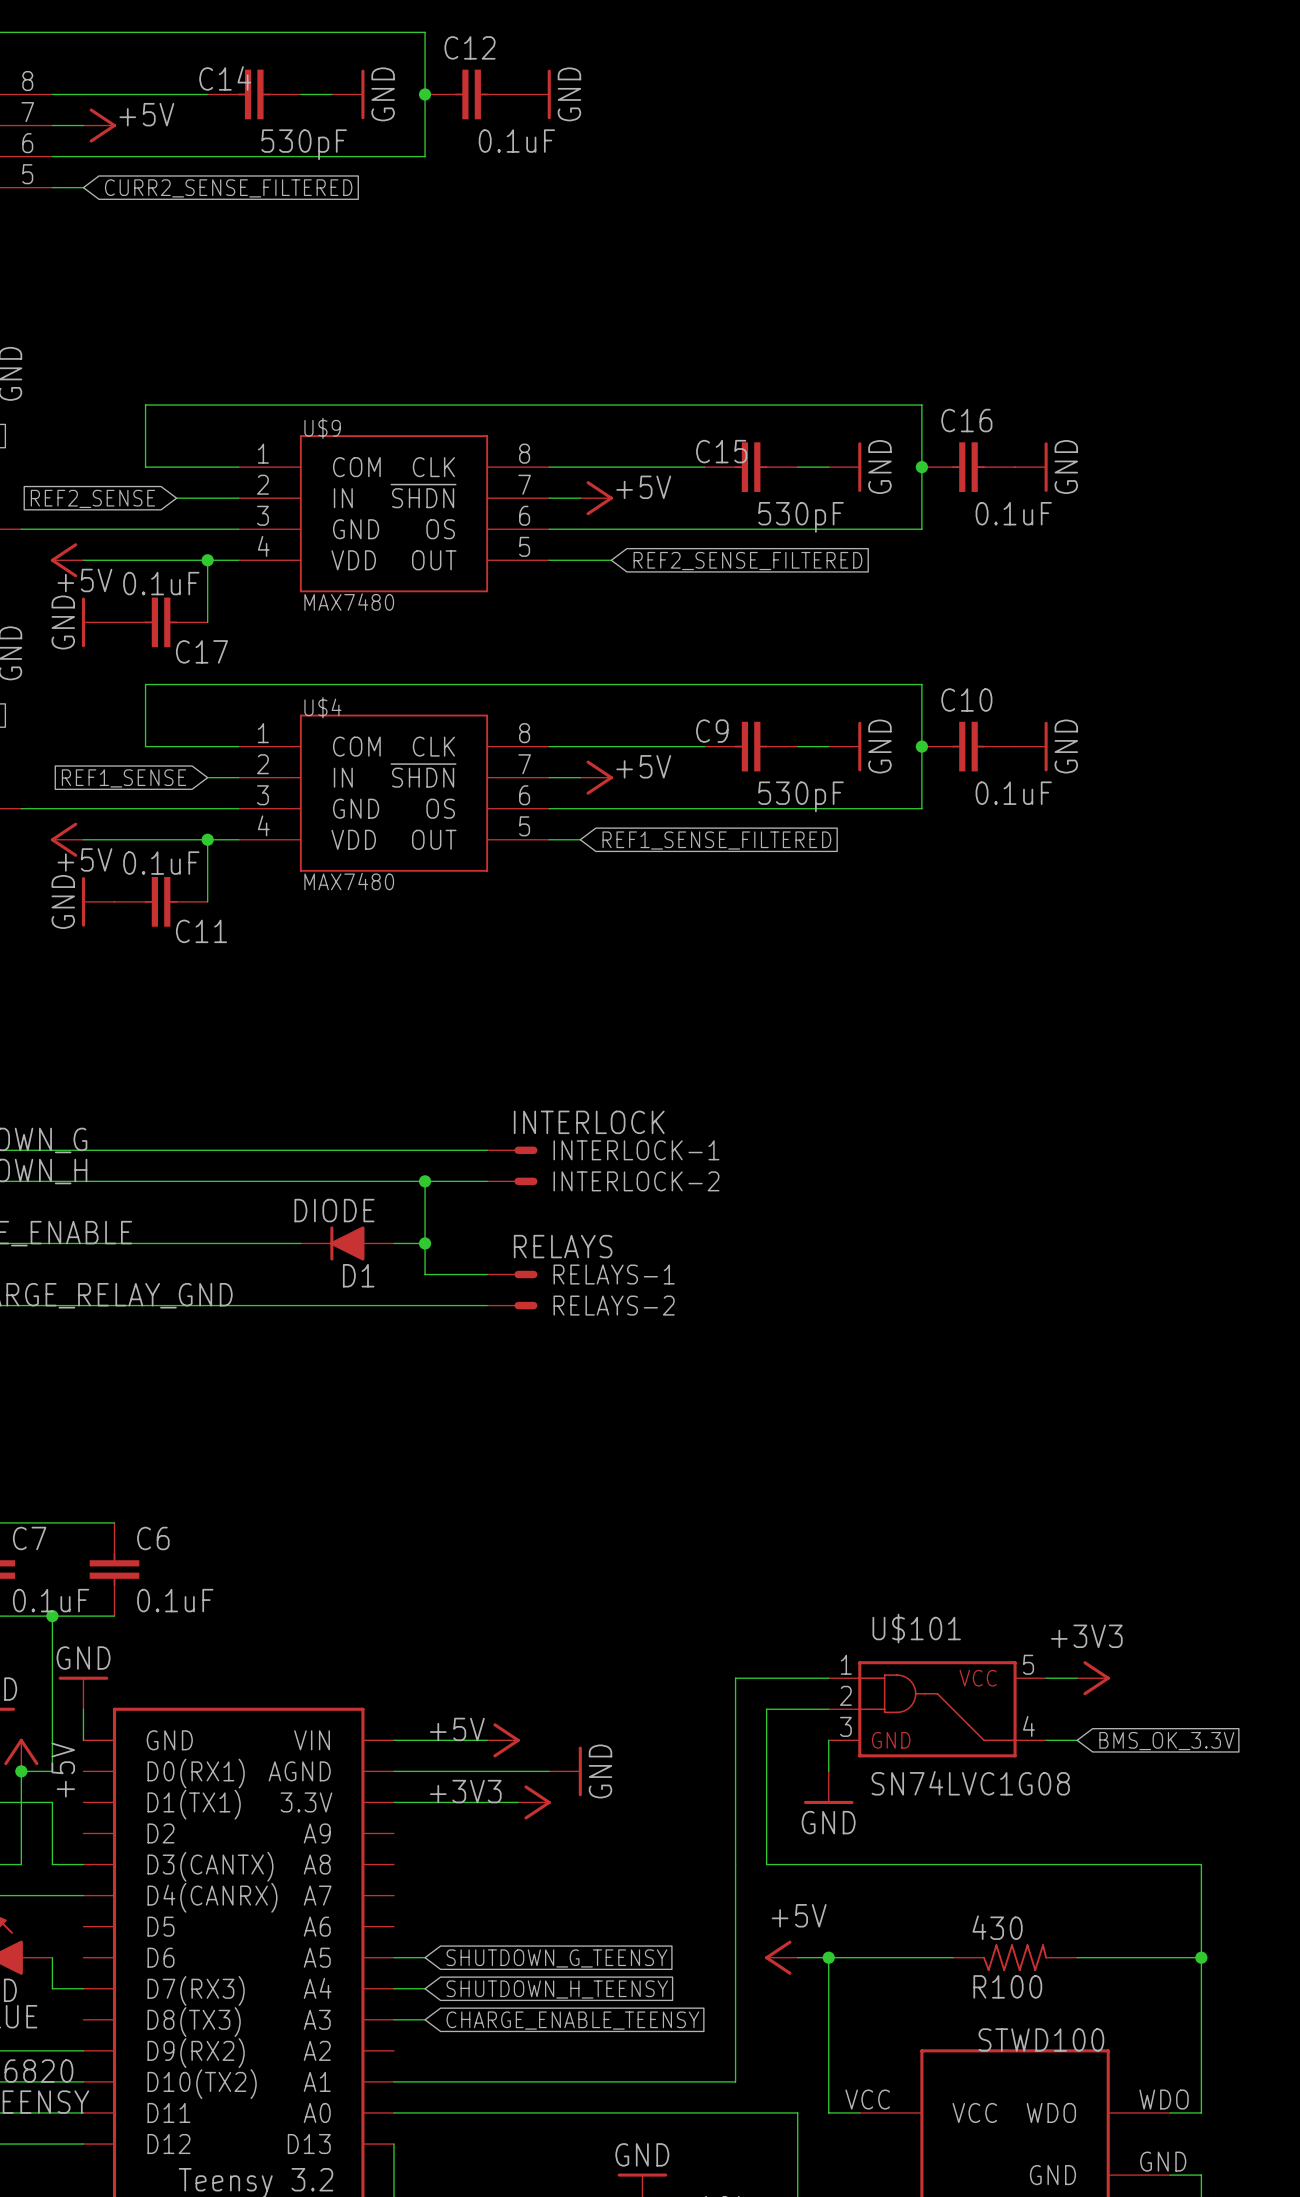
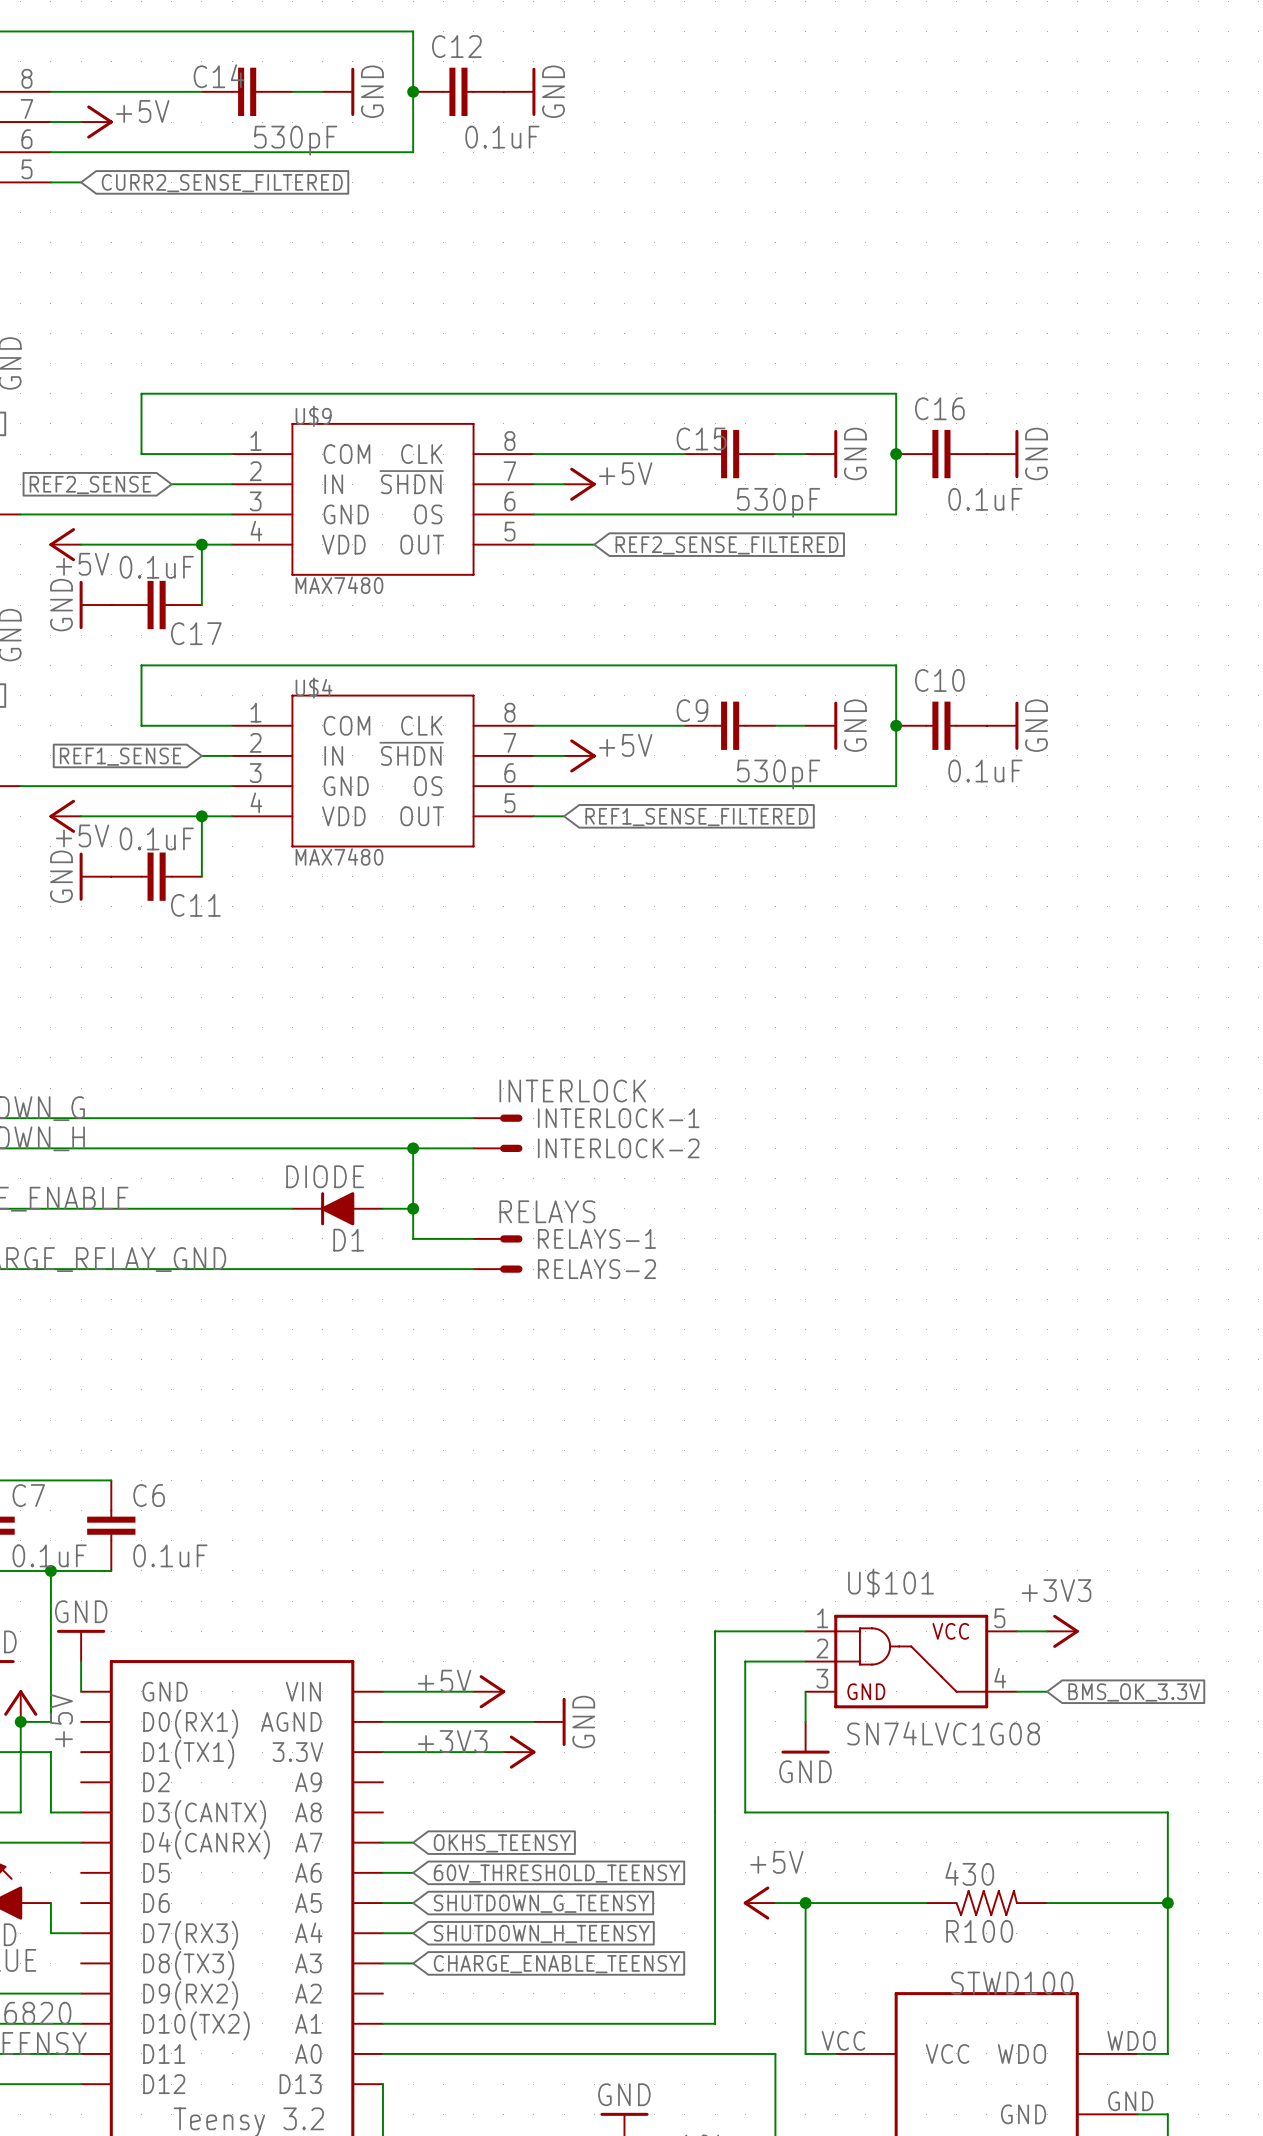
wire: none -> (382, 1842) (413, 1842)
global label: none -> OKHS_TEENSY (502, 1843)
wire: none -> (382, 1872) (413, 1872)
global label: none -> 60V_THRESHOLD_TEENSY (556, 1873)

